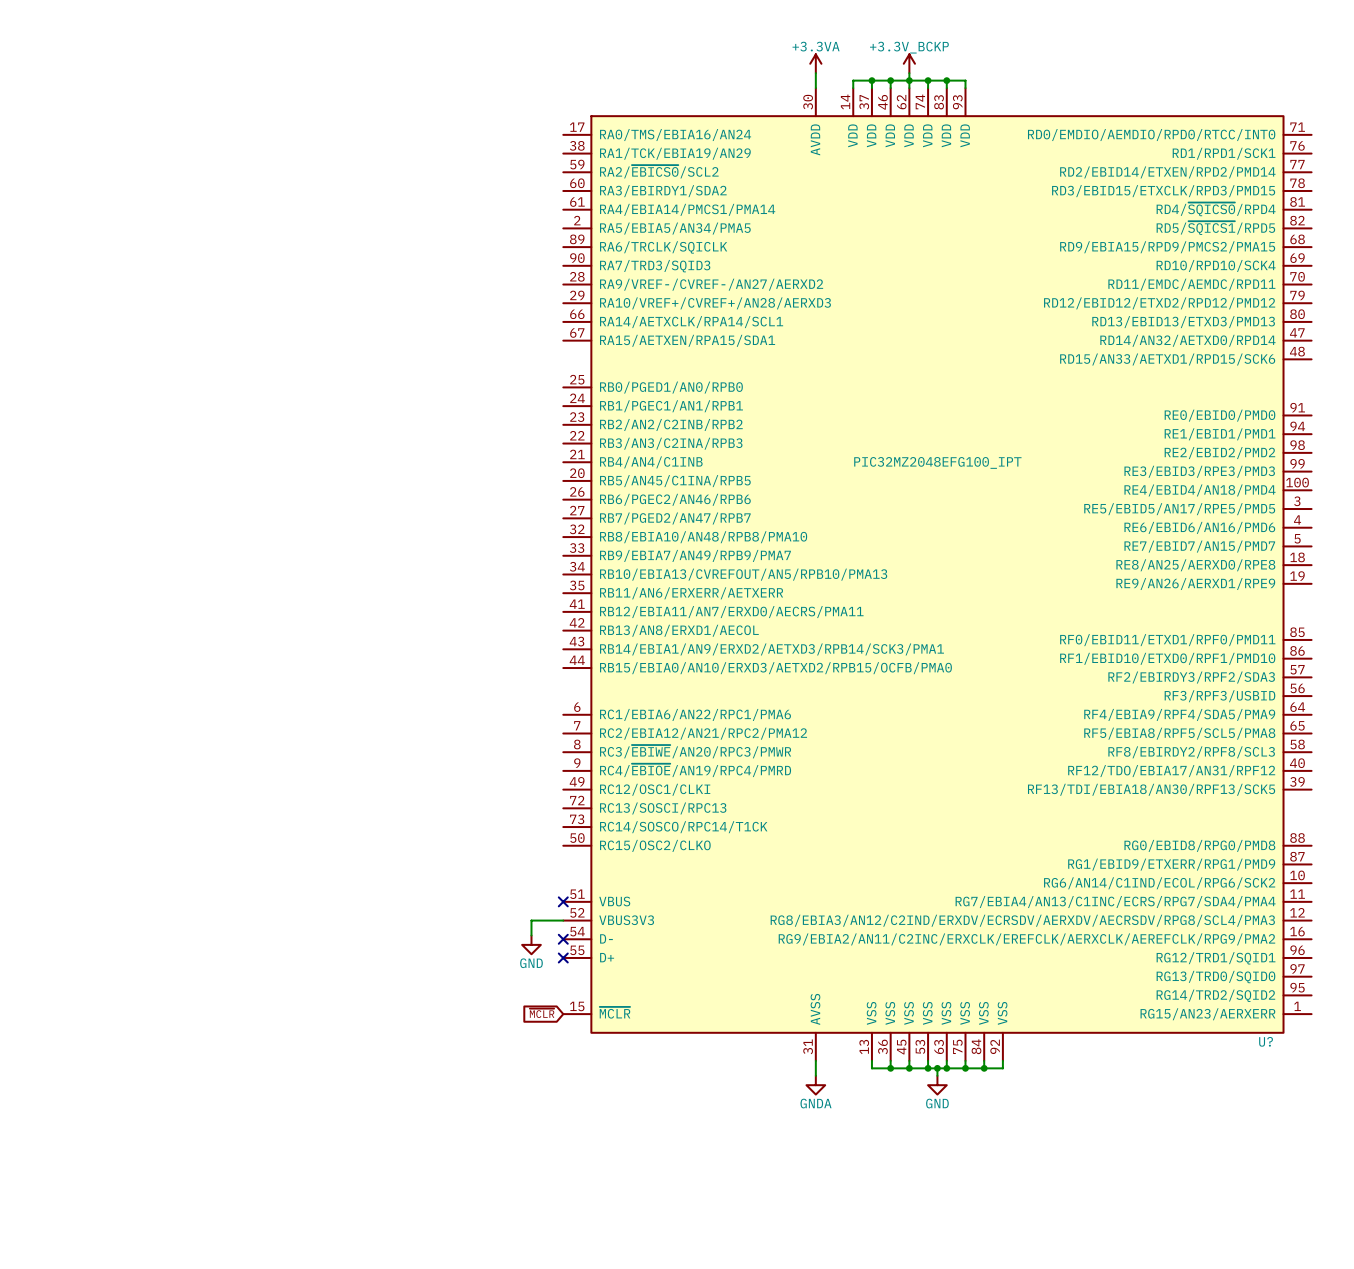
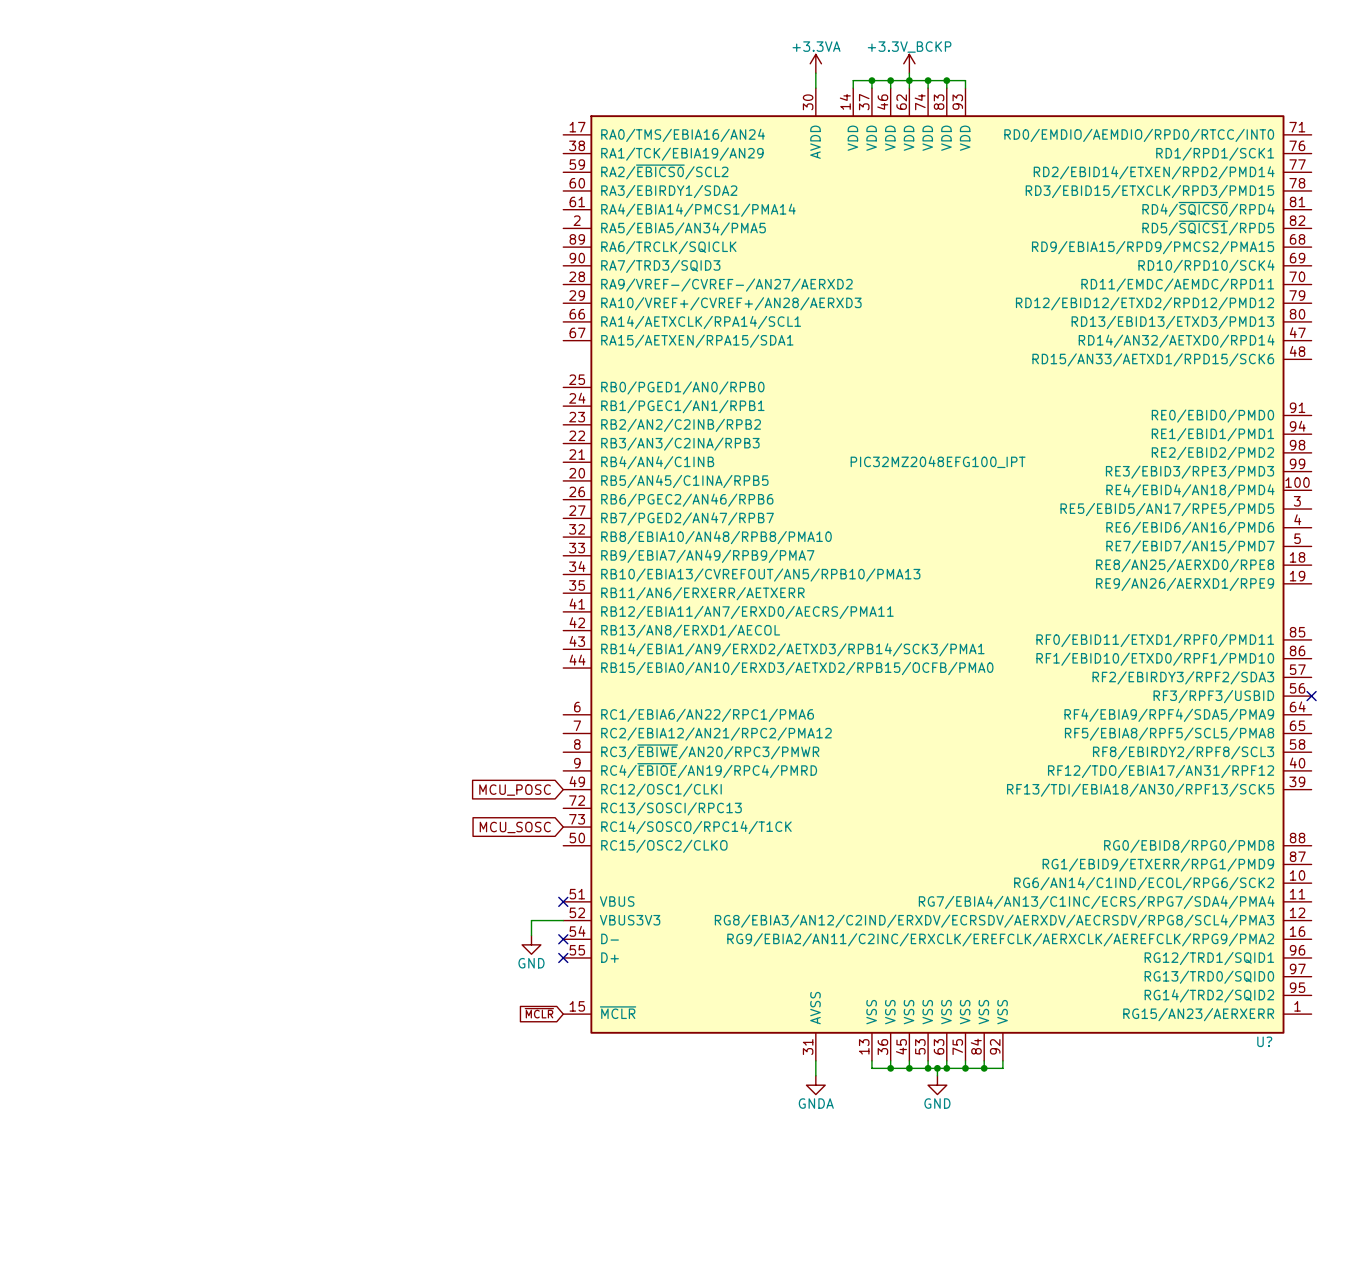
no-connect mark: none -> (1311, 696)
global label: none -> MCU_POSC (515, 790)
global label: none -> MCU_SOSC (515, 827)

